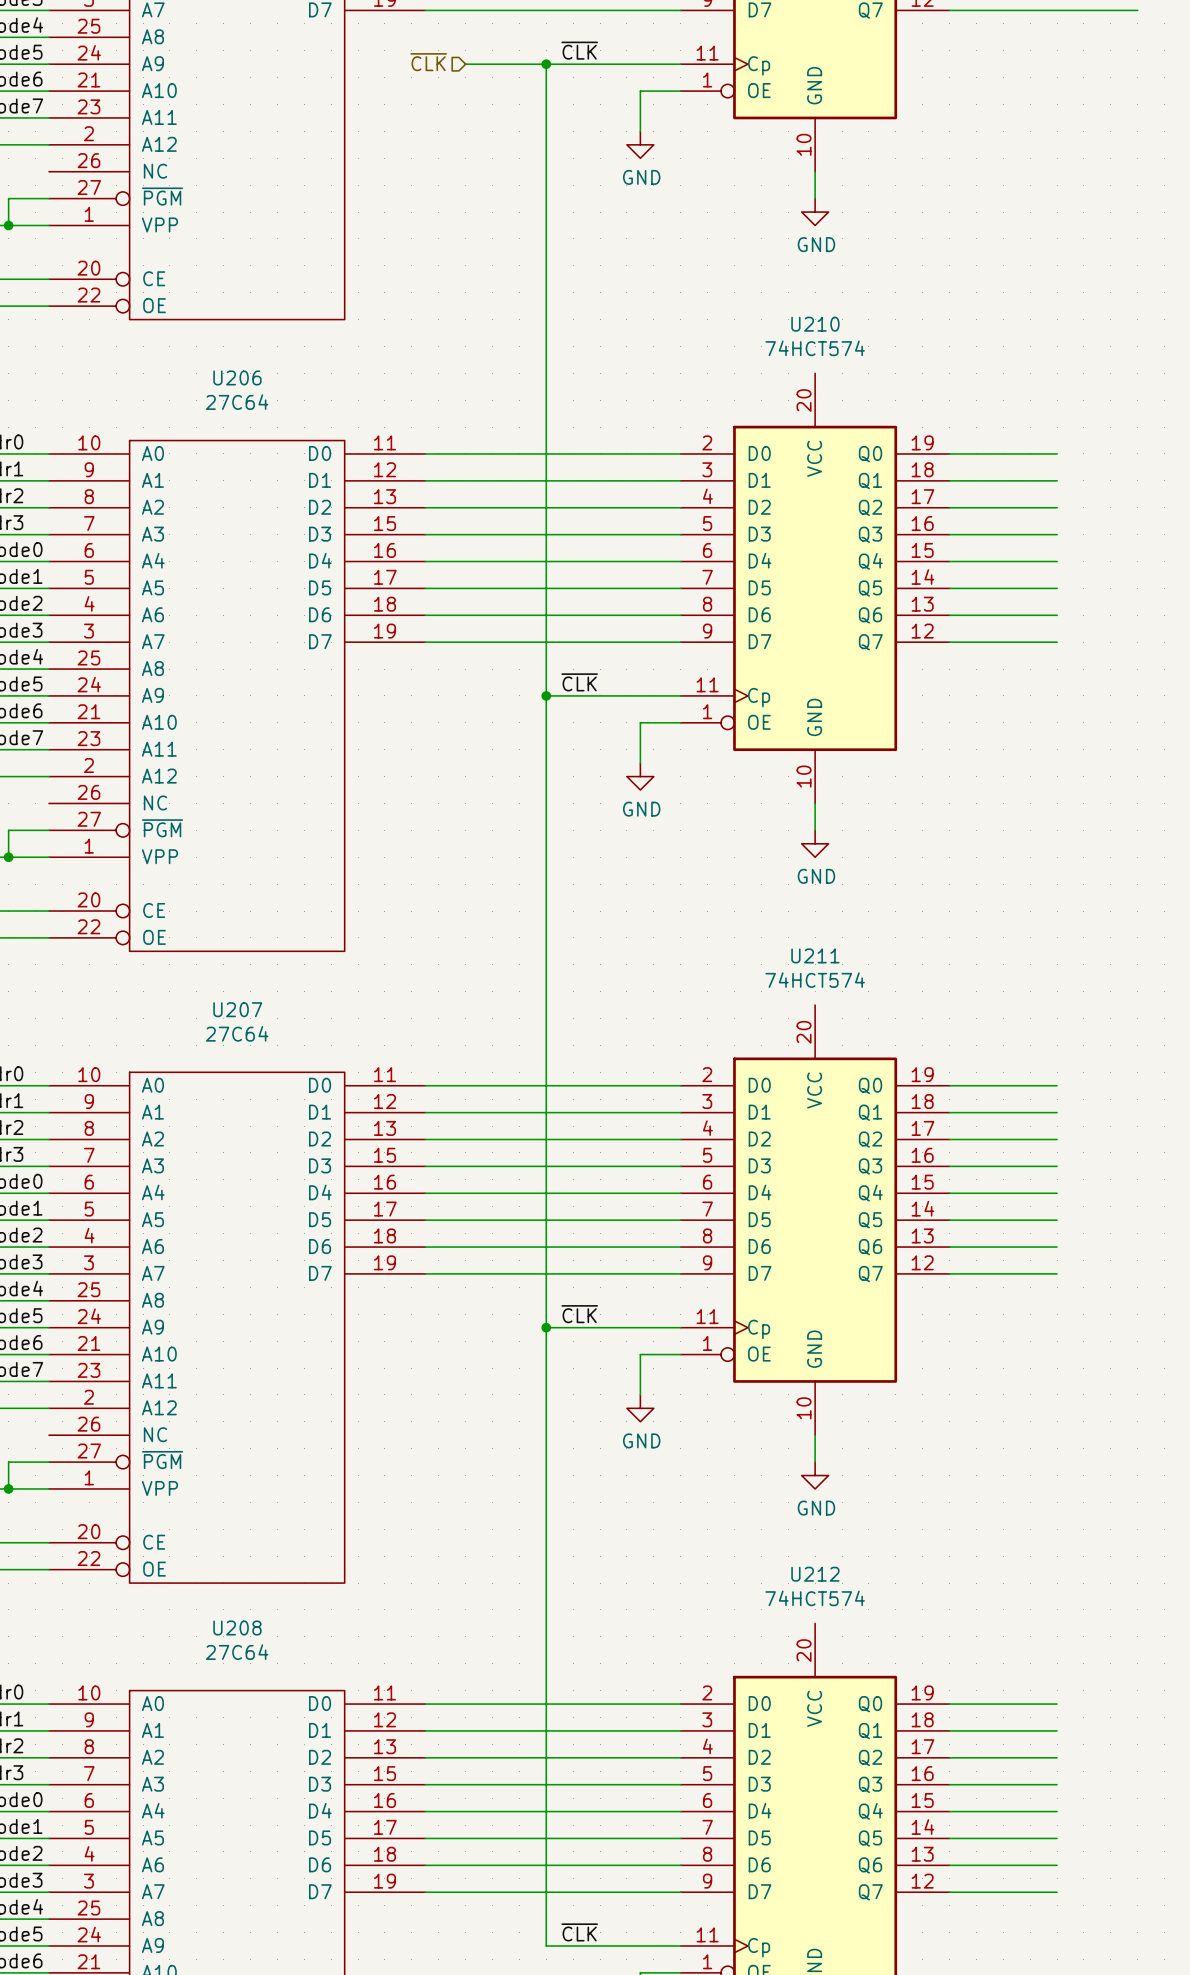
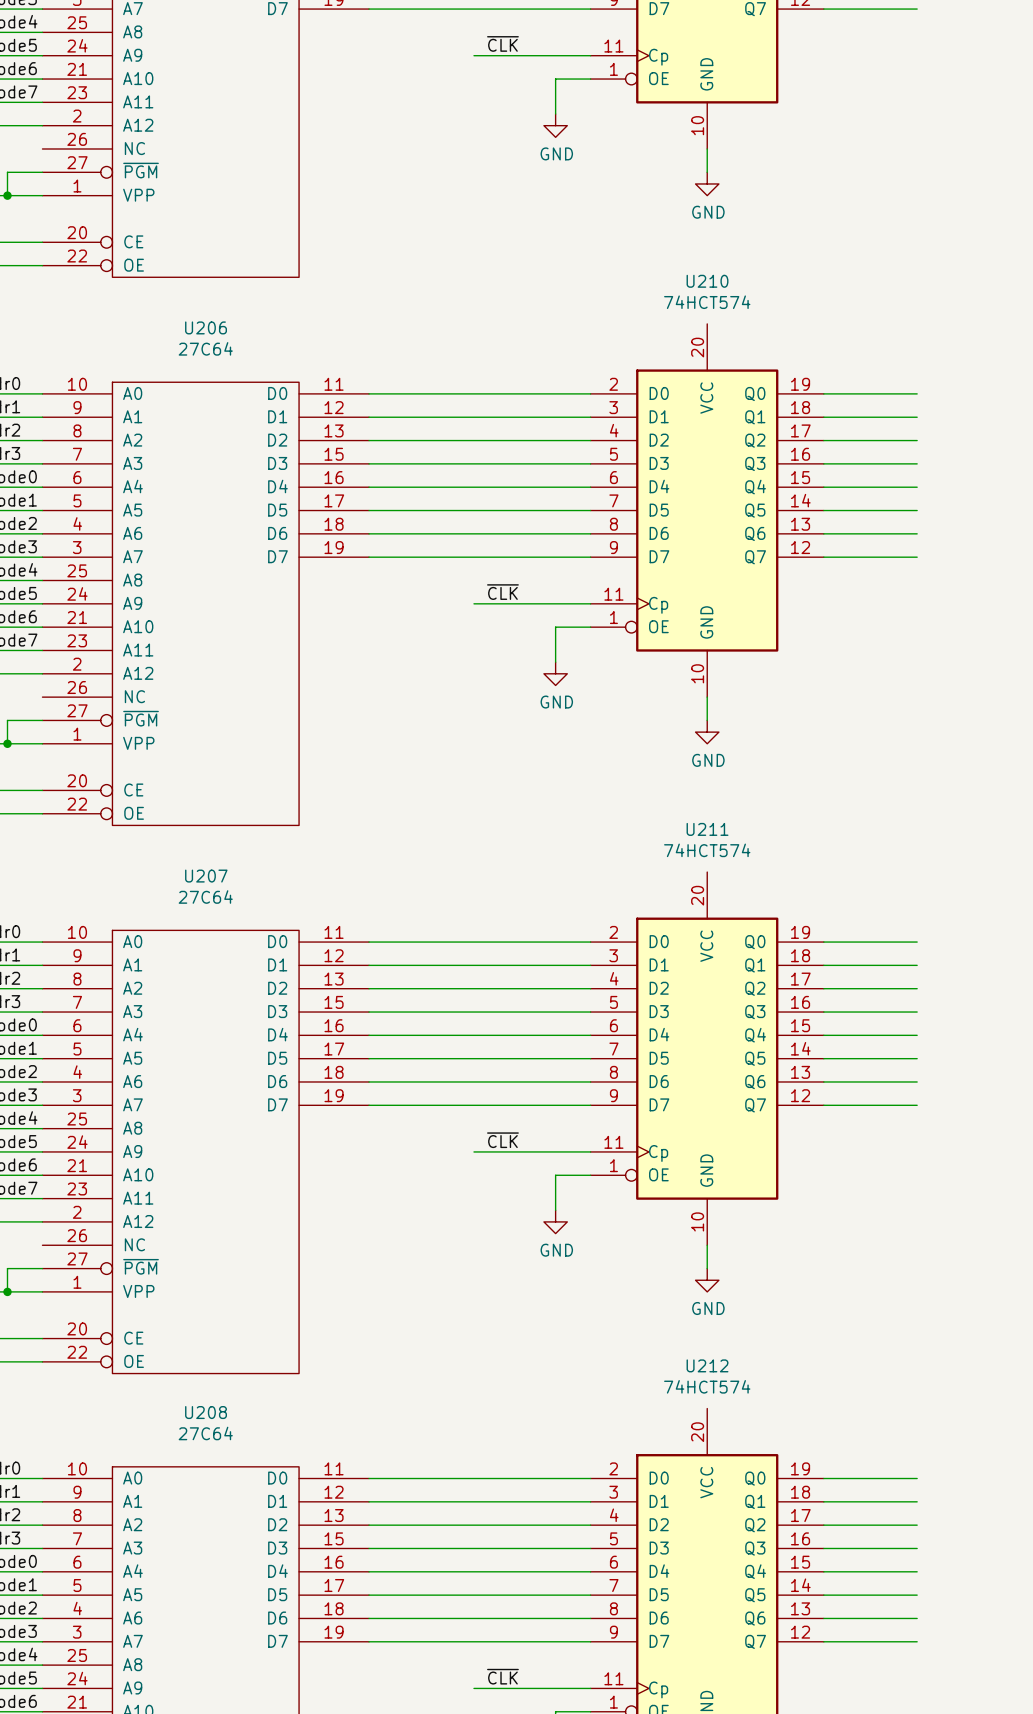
wire: (1057, 10) (1137, 10) -> none
hierarchical label: ~{CLK} (428, 62) -> none
wire: (465, 64) (546, 64) (546, 1945) -> none
junction: (546, 64) -> none
junction: (546, 695) -> none
junction: (546, 1327) -> none

